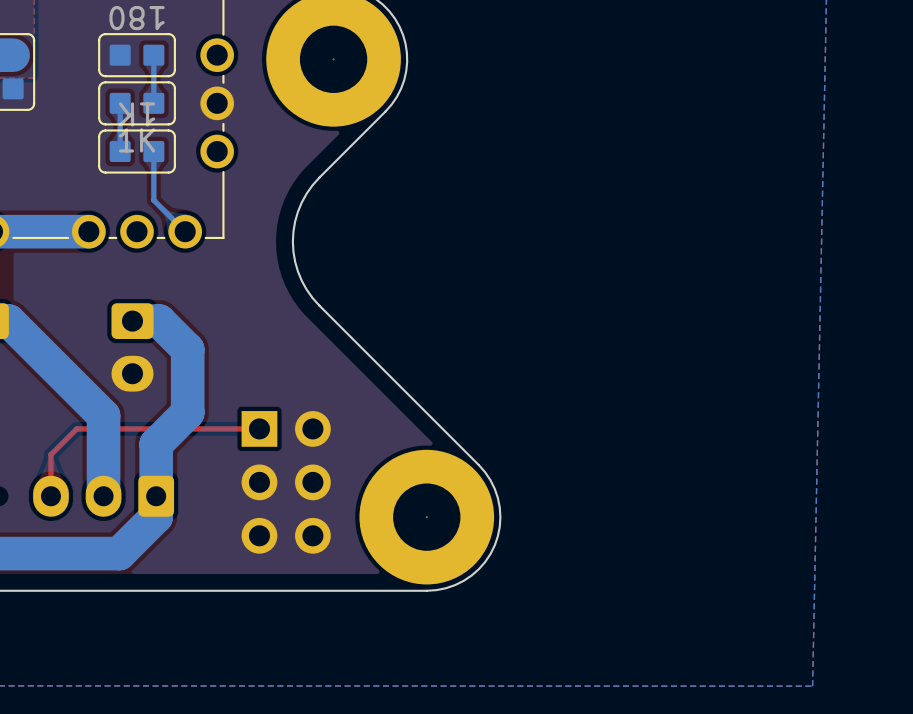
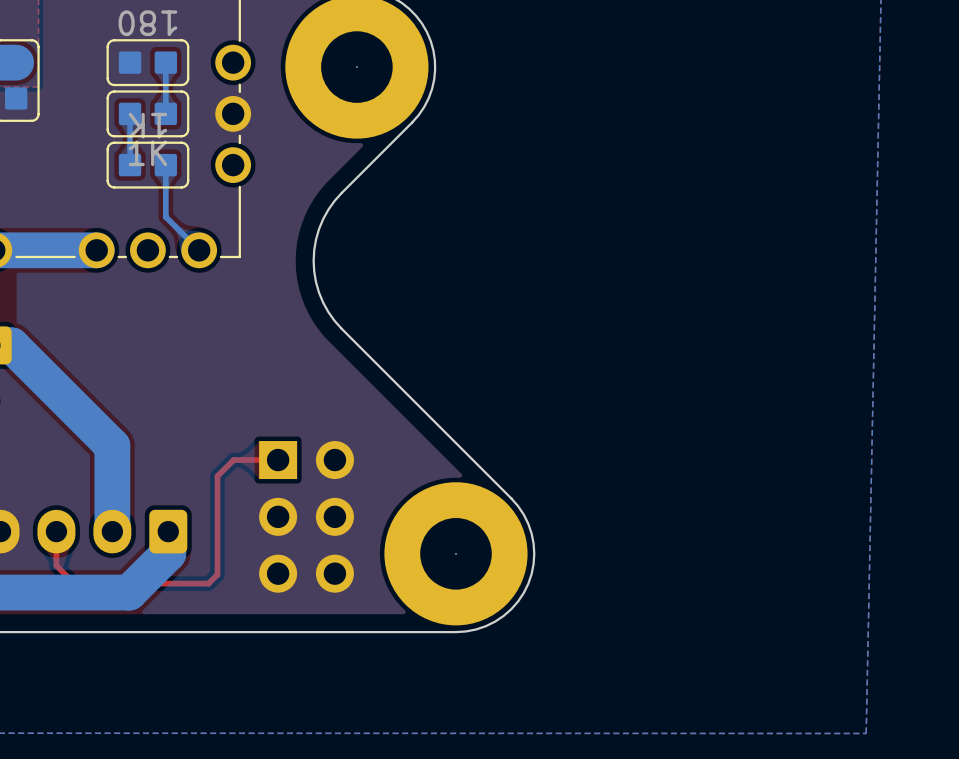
bottom track: (132, 321) (159, 321) (187, 349) (187, 412) (156, 444) (156, 496) -> none
part: (132, 347) -> none
top track: (217, 428) (76, 428) (50, 454) (50, 496) -> (233, 460) (217, 476) (217, 574) (208, 583) (74, 583) (56, 565) (56, 531)

